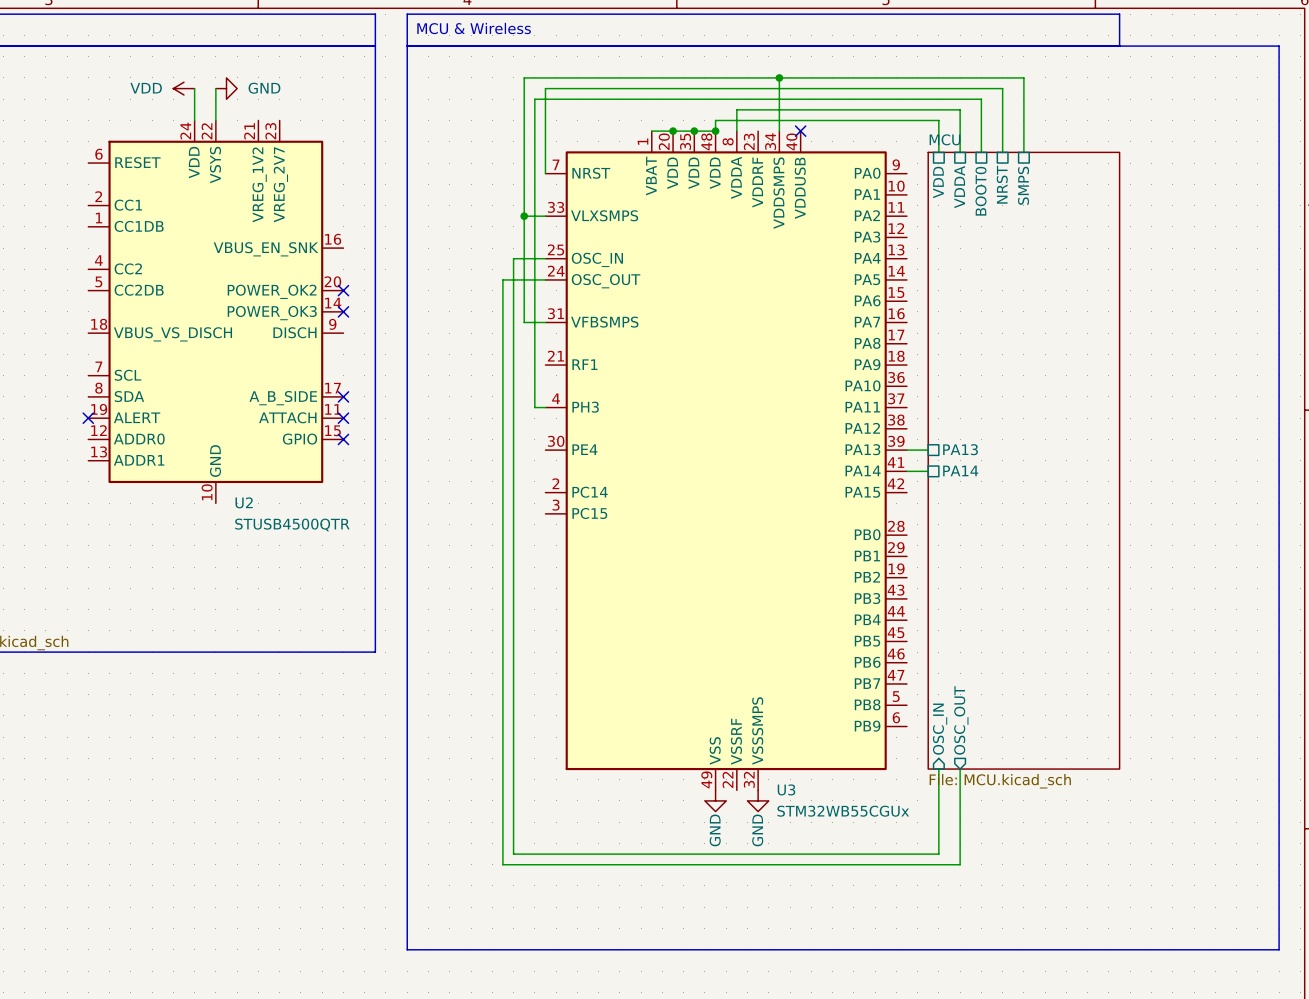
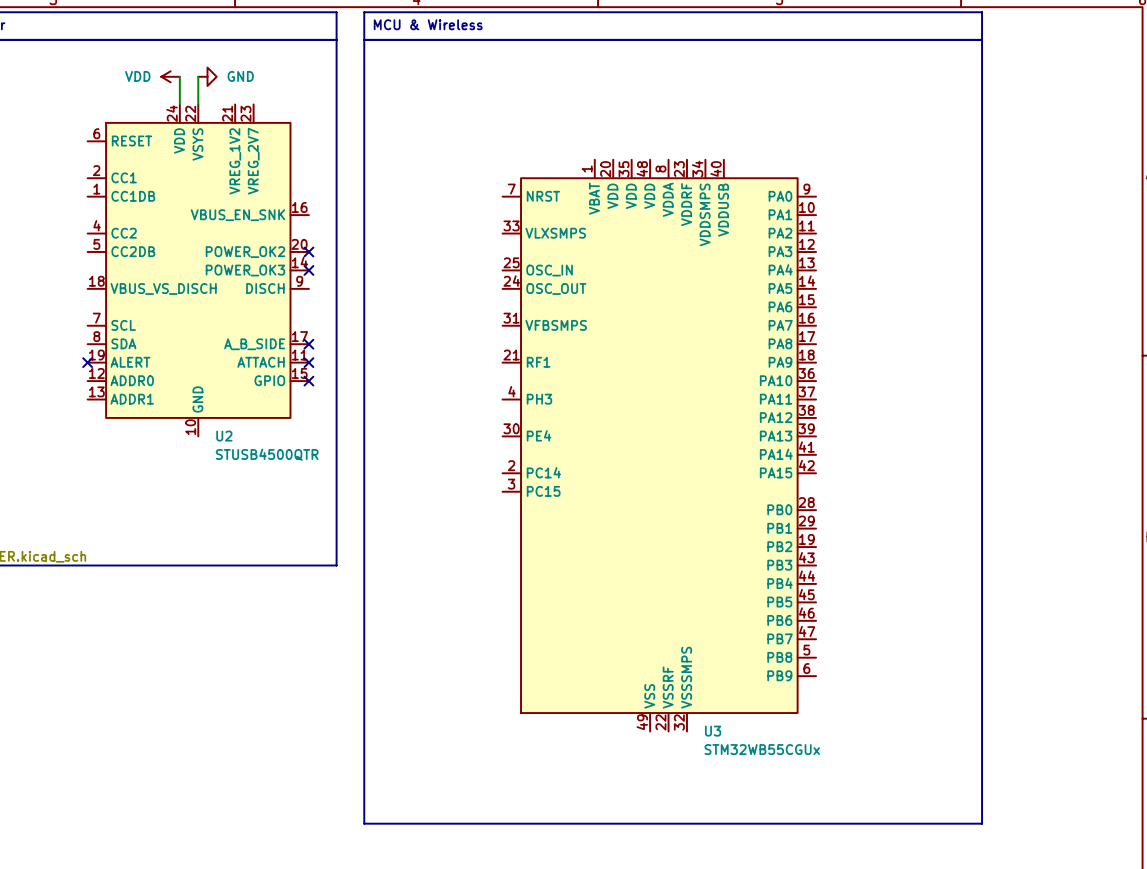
line: (1119, 46) (1279, 46) (1279, 949) (1119, 949) -> (982, 39) (982, 823)
wire: (779, 77) (779, 131) -> none
junction: (779, 77) -> none
wire: (651, 131) (715, 131) (715, 120) (938, 120) (938, 152) -> none
junction: (673, 131) -> none
junction: (694, 131) -> none
junction: (715, 131) -> none
wire: (736, 131) (736, 109) (960, 109) (960, 152) -> none
no-connect mark: (800, 131) -> none
wire: (981, 152) (981, 99) (534, 99) (534, 407) (545, 407) -> none
wire: (1002, 152) (1002, 88) (545, 88) (545, 173) -> none
wire: (1023, 152) (1023, 77) (524, 77) (524, 322) (545, 322) -> none
sheet pin: VDD (938, 182) -> none
sheet pin: NRST (1002, 184) -> none
sheet pin: SMPS (1023, 185) -> none
sheet pin: VDDA (959, 187) -> none
sheet pin: BOOT0 (980, 191) -> none
wire: (524, 216) (545, 216) -> none
junction: (524, 216) -> none
wire: (545, 258) (513, 258) (513, 854) (938, 854) (938, 769) -> none
wire: (545, 279) (502, 279) (502, 864) (960, 864) (960, 769) -> none
sheet pin: PA13 (960, 449) -> none
wire: (906, 450) (928, 450) -> none
U3 position: (726, 460) -> (659, 445)
sheet MCU: File: MCU.kicad_sch (1023, 460) -> none
sheet pin: PA14 (960, 470) -> none
wire: (906, 471) (928, 471) -> none
sheet pin: OSC_OUT (961, 720) -> none
sheet pin: OSC_IN (940, 729) -> none
power symbol: GND (715, 800) -> none
power symbol: GND (758, 800) -> none

